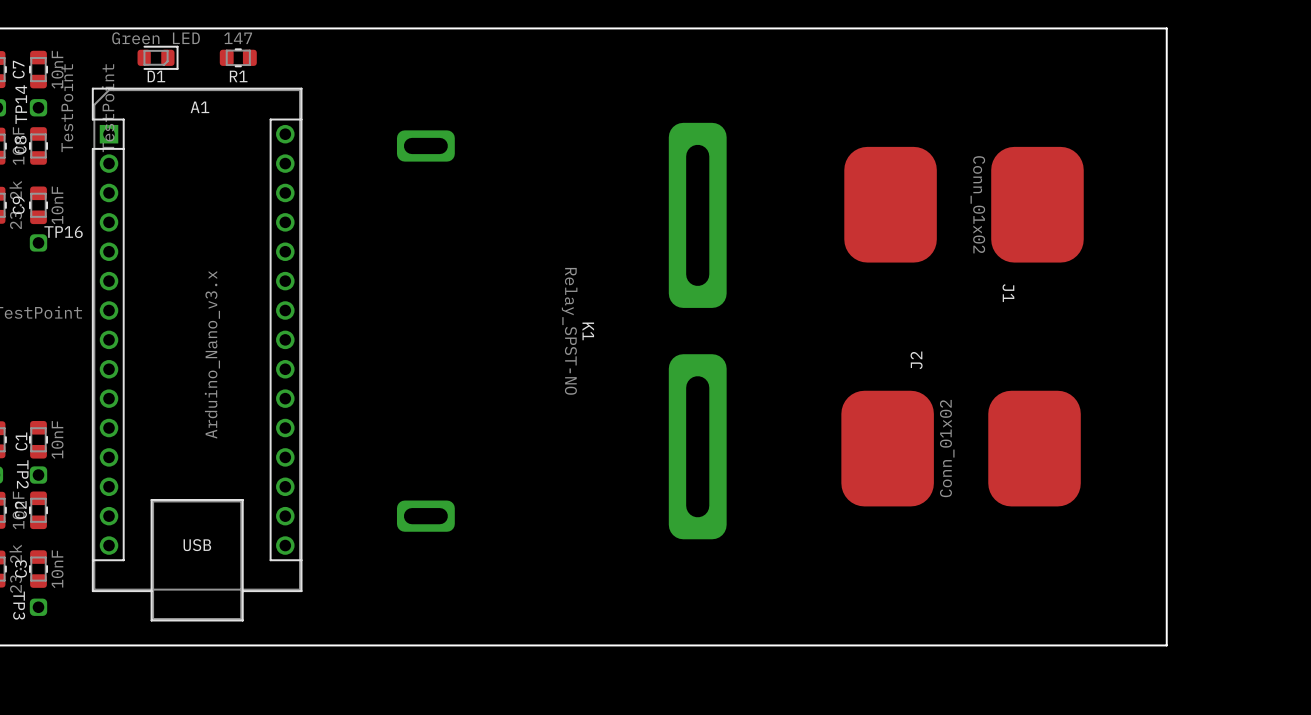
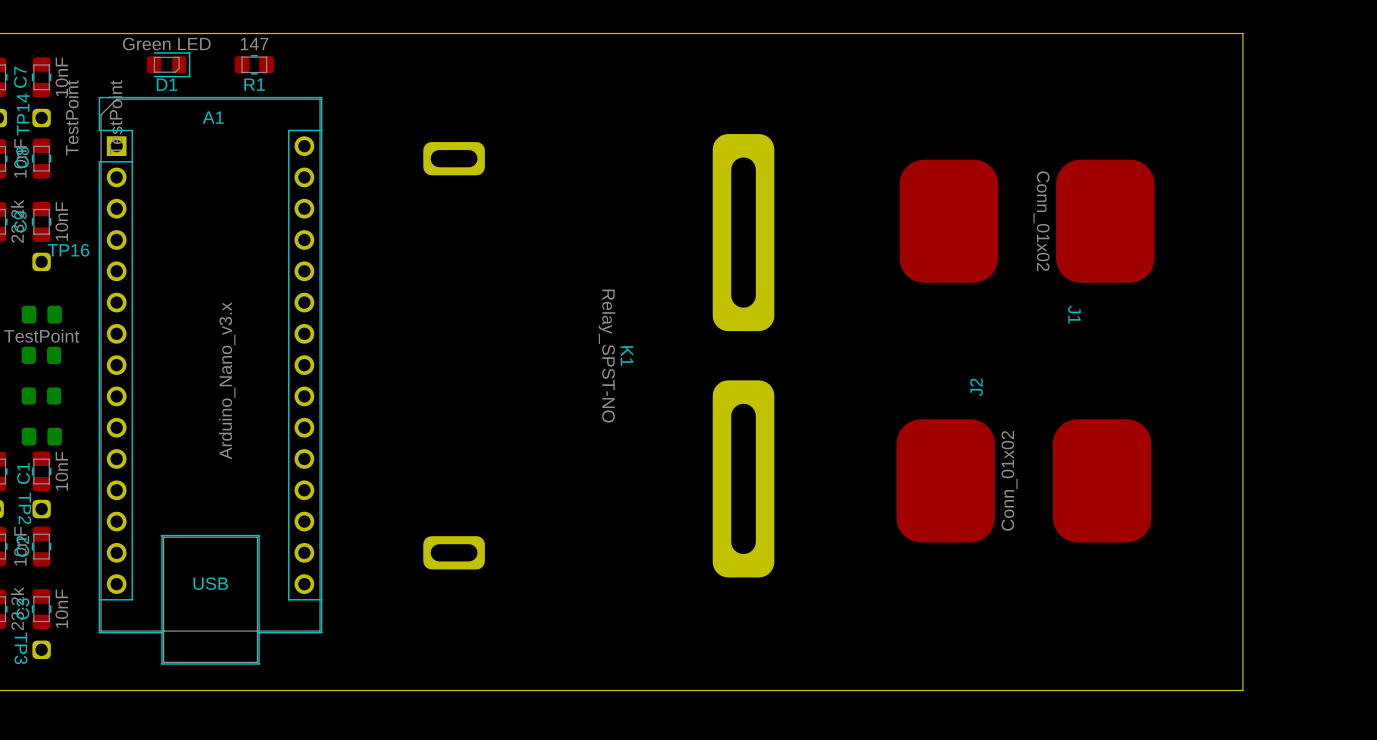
part: none -> (41, 314)
part: none -> (41, 355)
part: none -> (41, 396)
part: none -> (41, 436)

